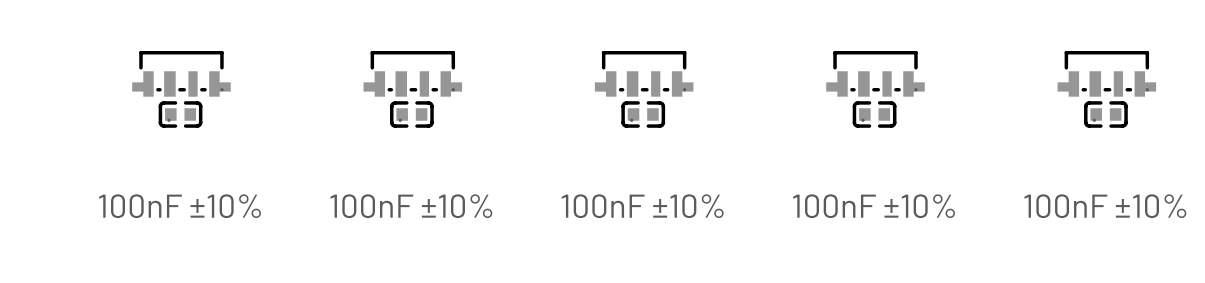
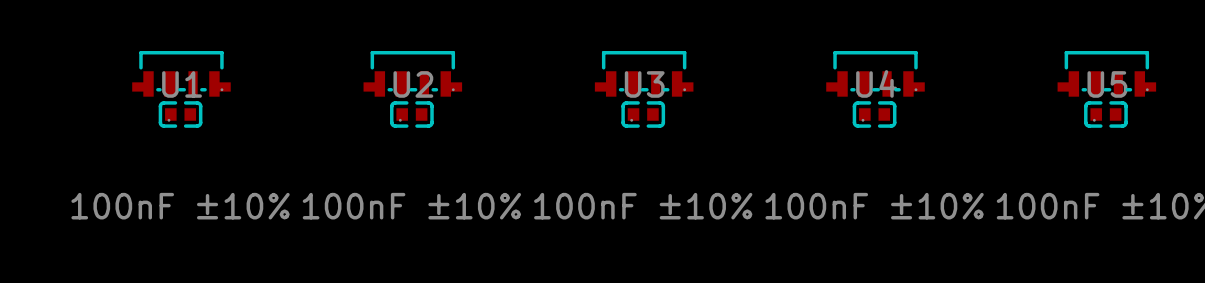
U1 name: none -> U1 (182, 84)
U2 name: none -> U2 (413, 84)
U3 name: none -> U3 (644, 84)
U4 name: none -> U4 (876, 83)
U5 name: none -> U5 (1107, 84)

